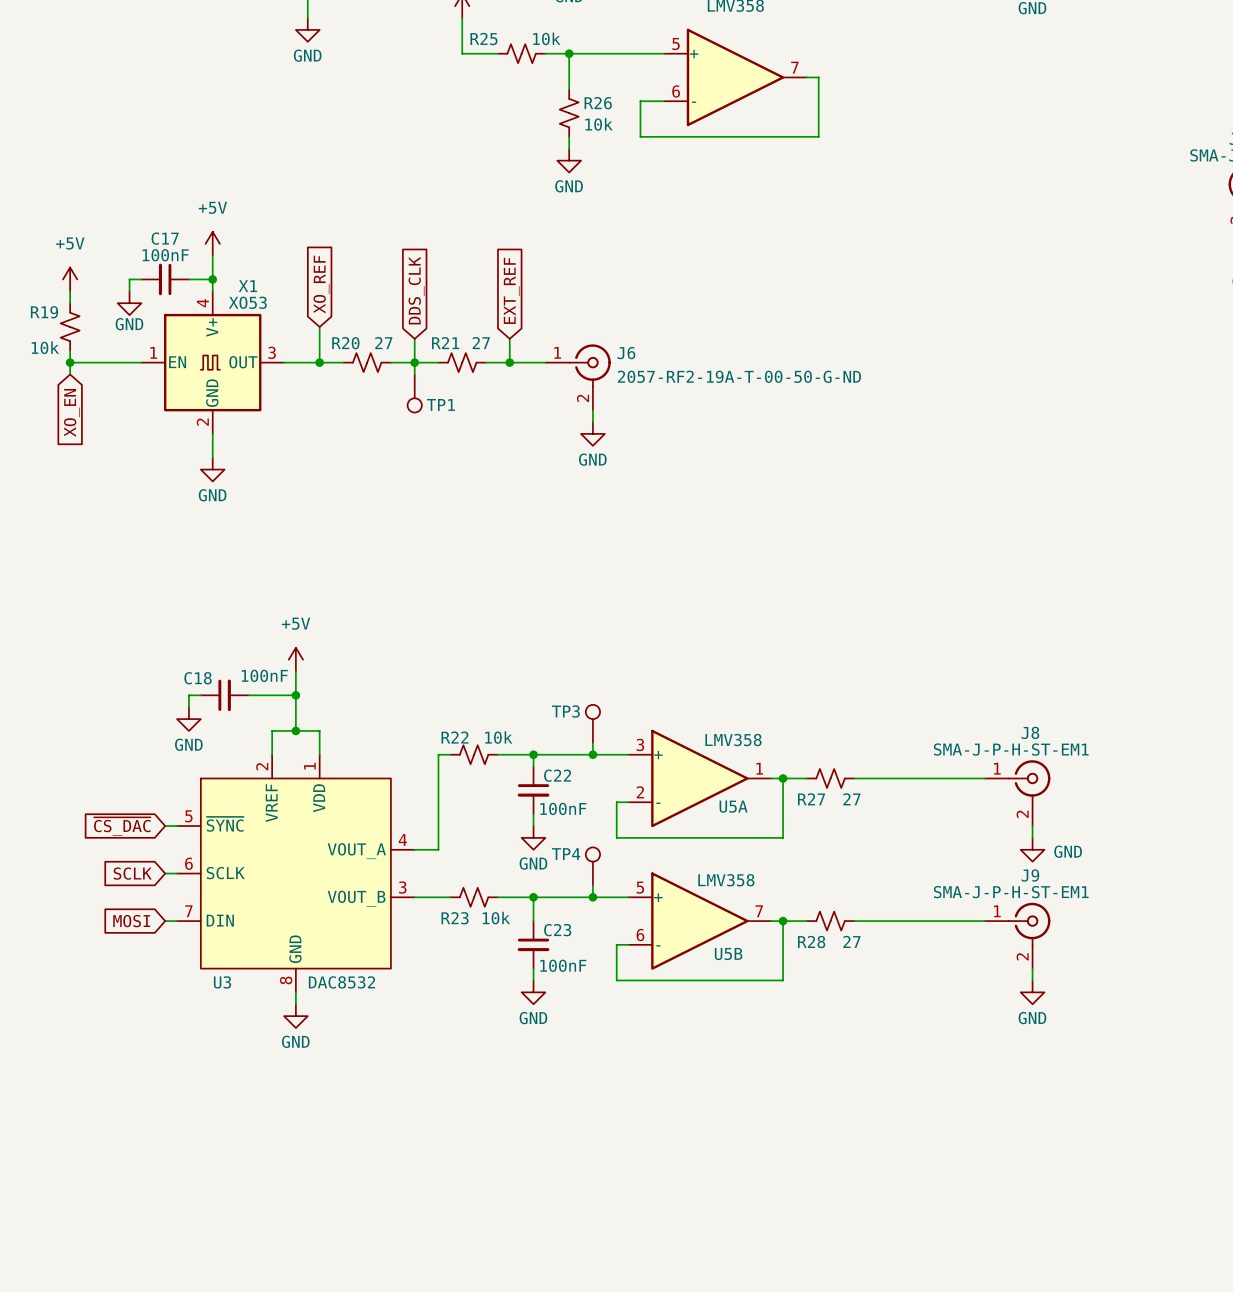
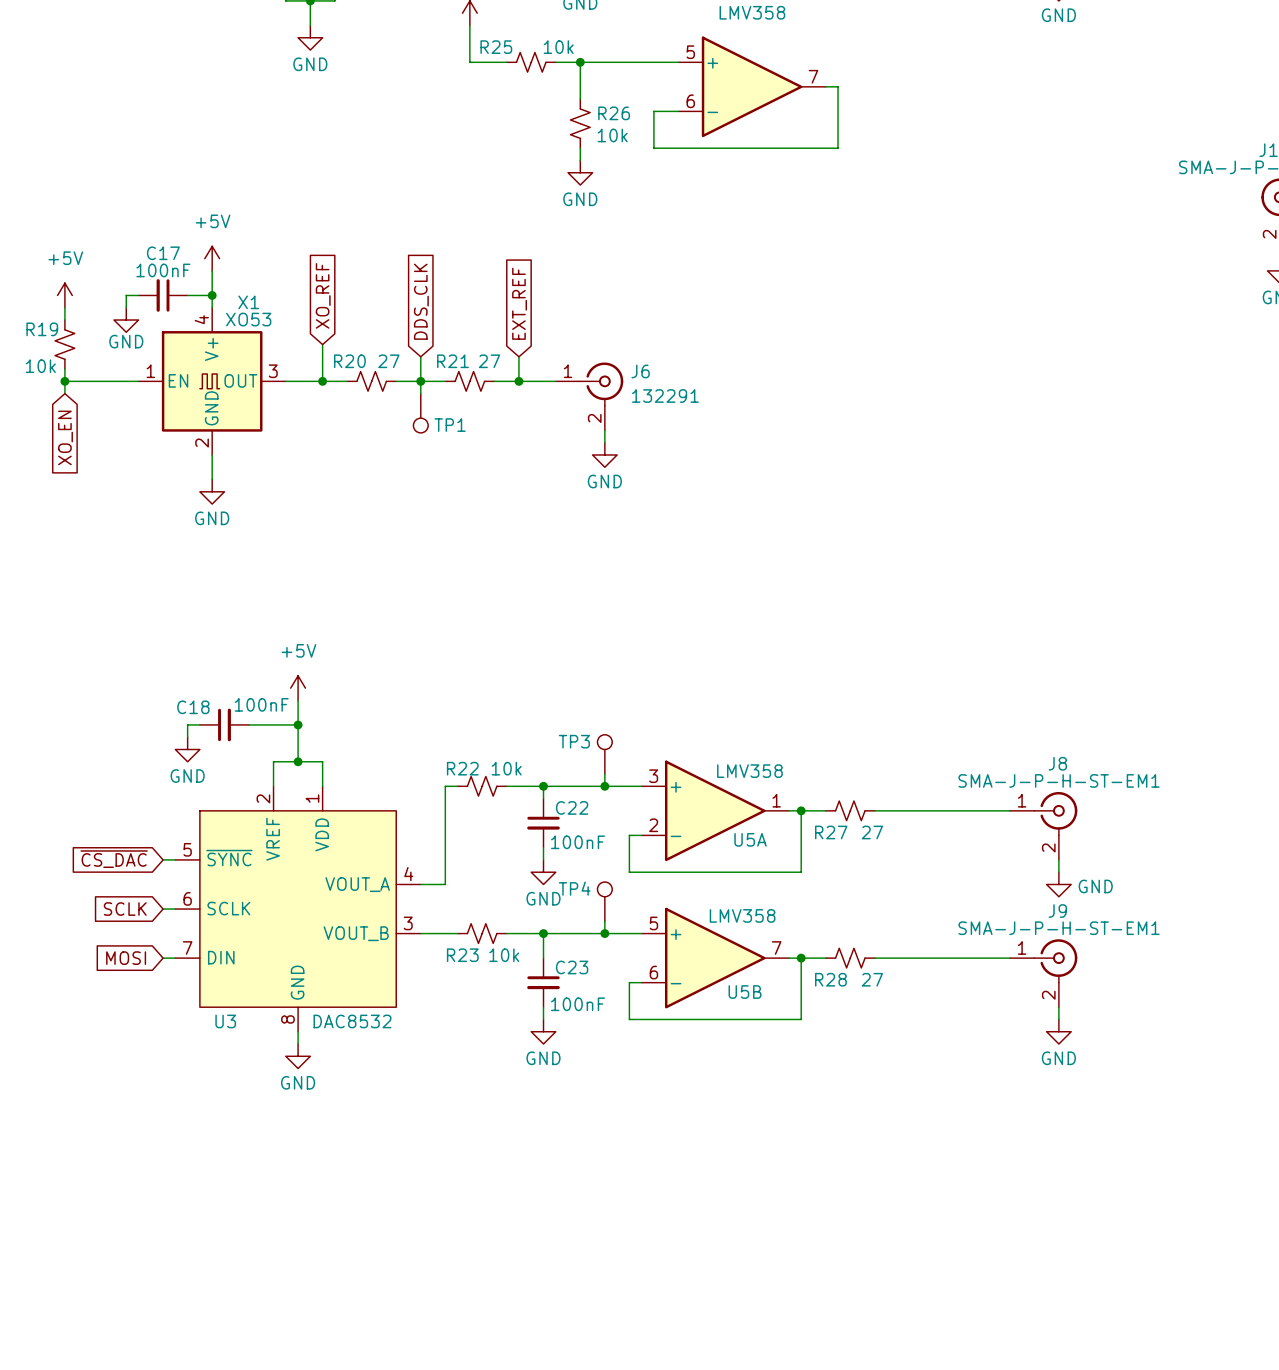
J6 value: 2057-RF2-19A-T-00-50-G-ND (739, 376) -> 132291 (665, 396)

